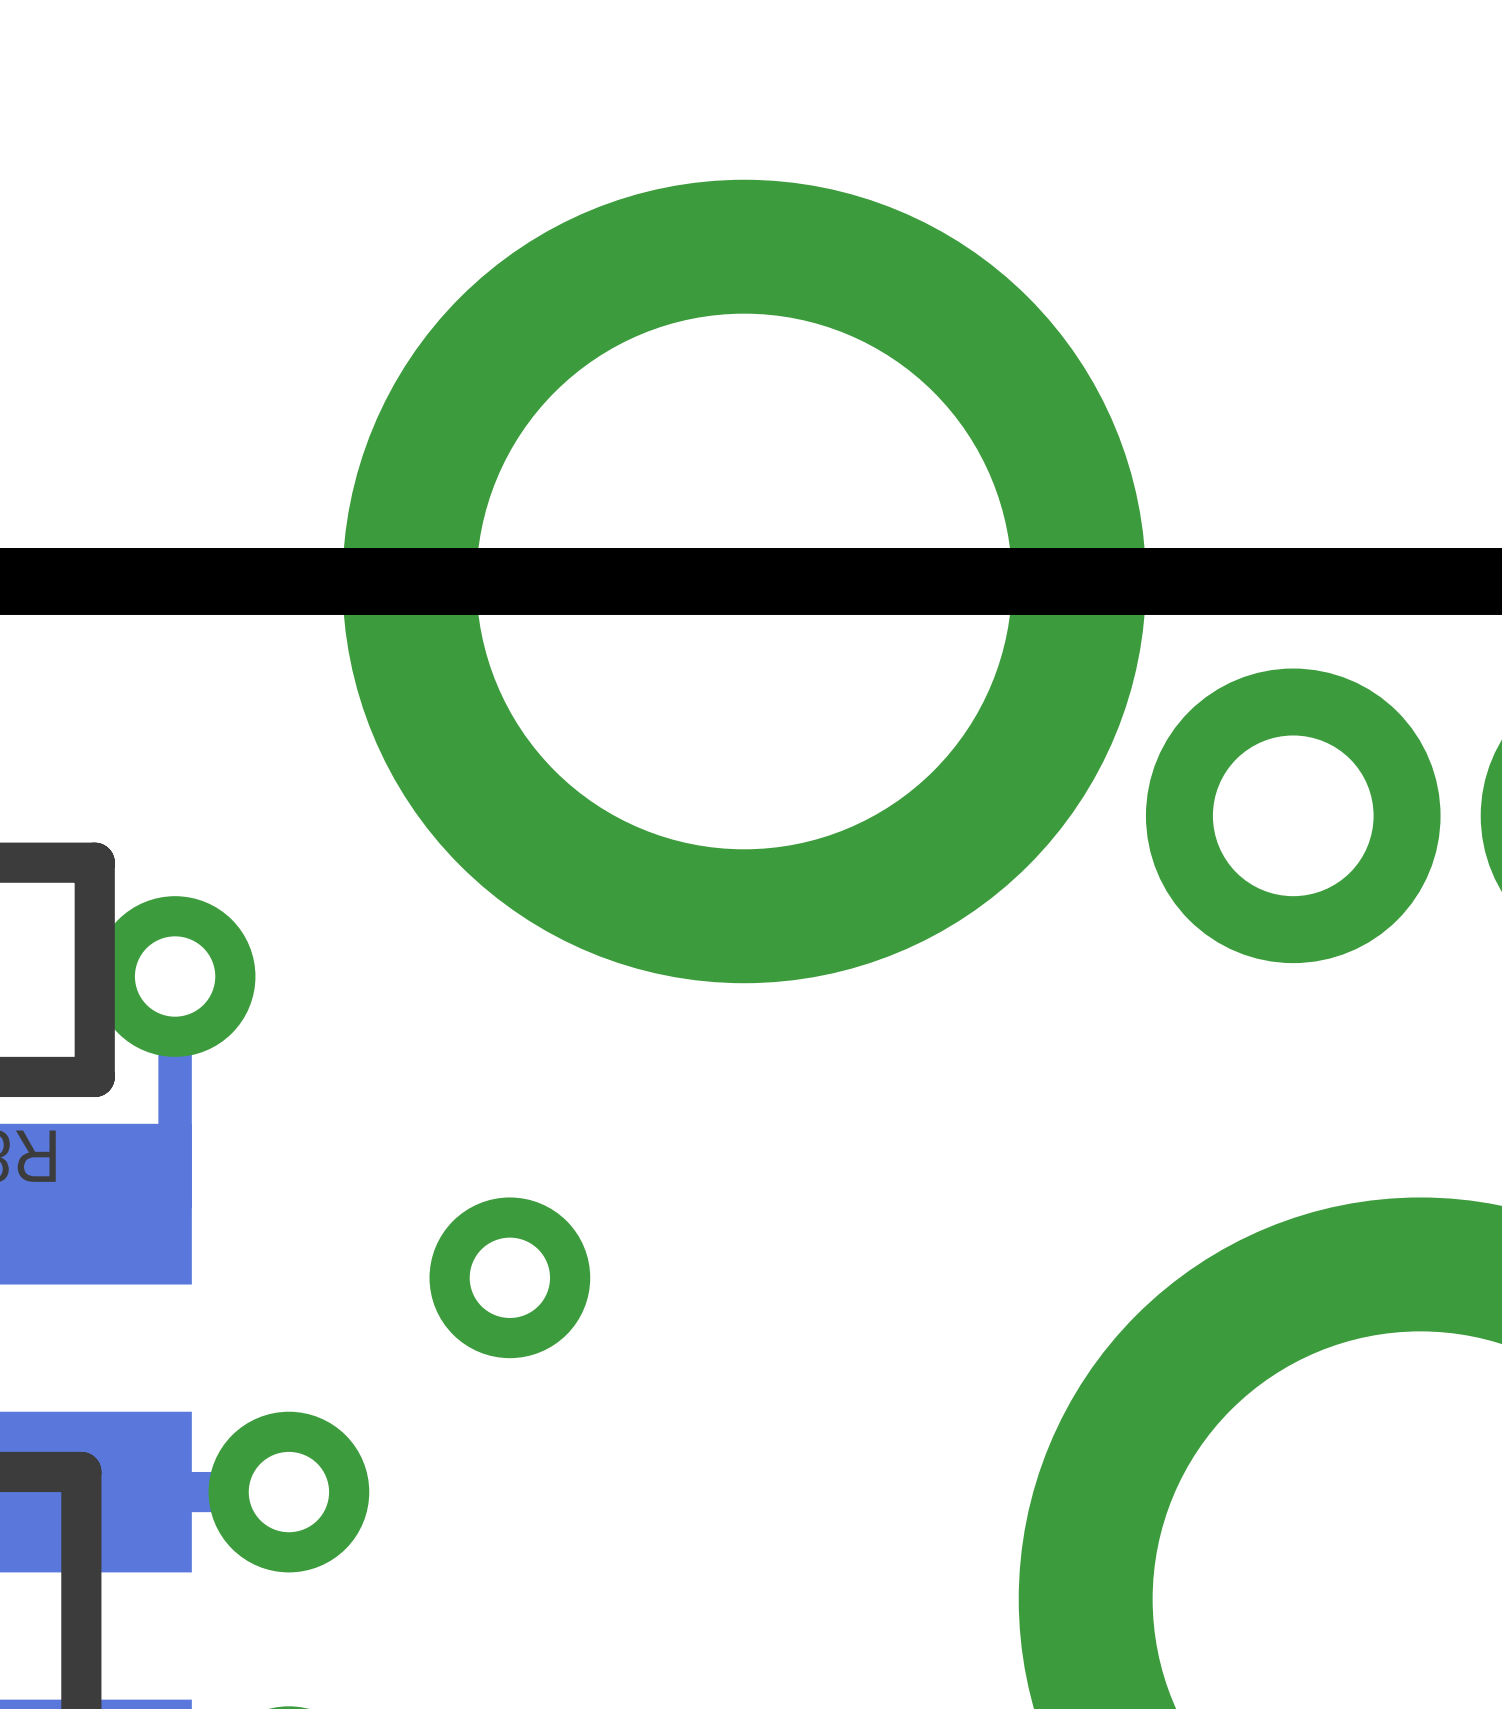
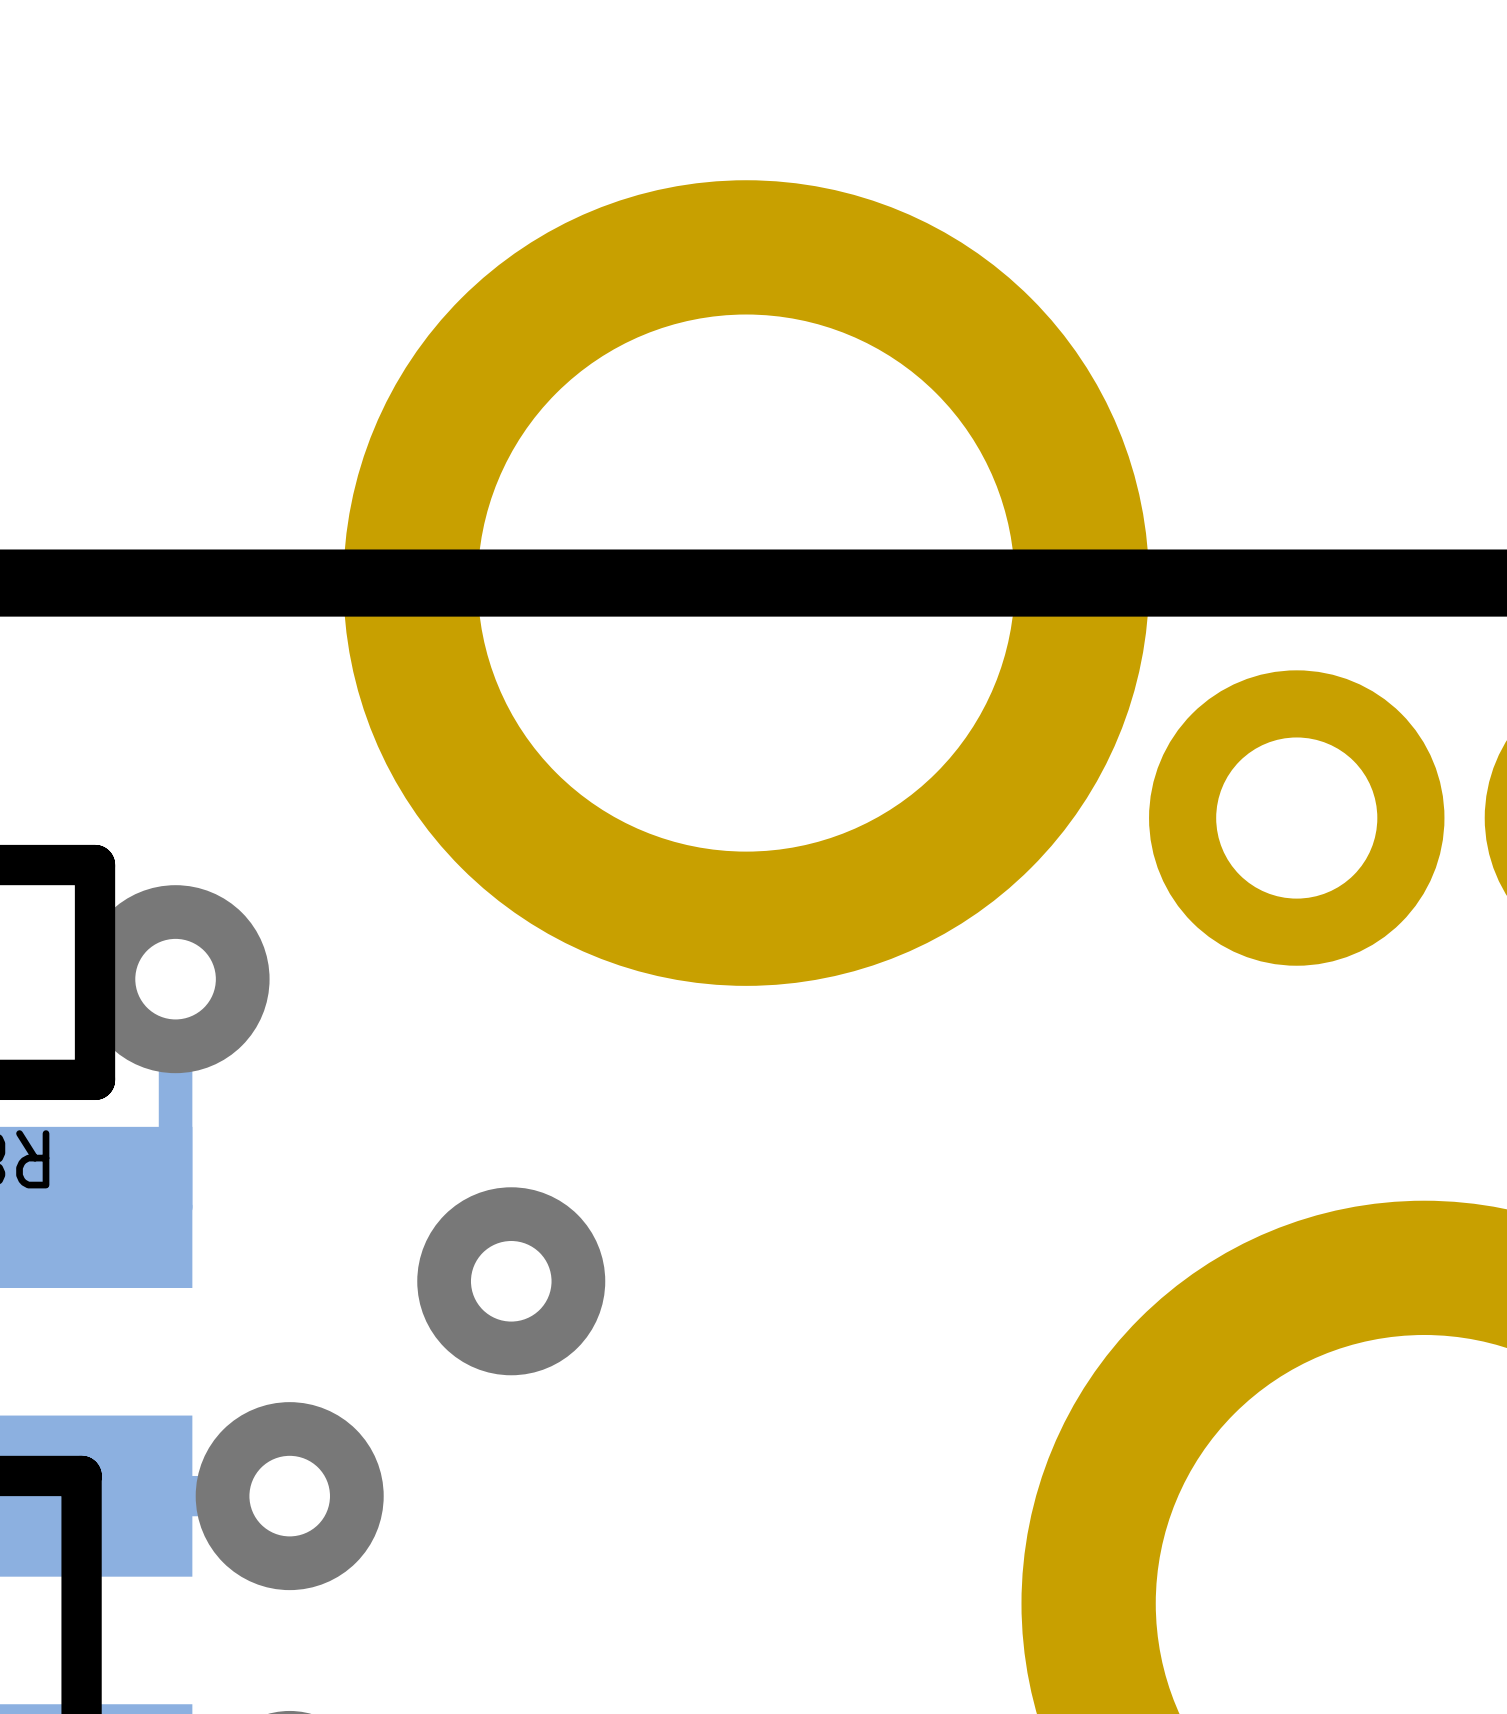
via size: [94, 896, 256, 1057] -> [81, 885, 270, 1074]
via size: [429, 1197, 591, 1359] -> [417, 1187, 606, 1376]
via size: [208, 1411, 370, 1573] -> [195, 1402, 384, 1591]

